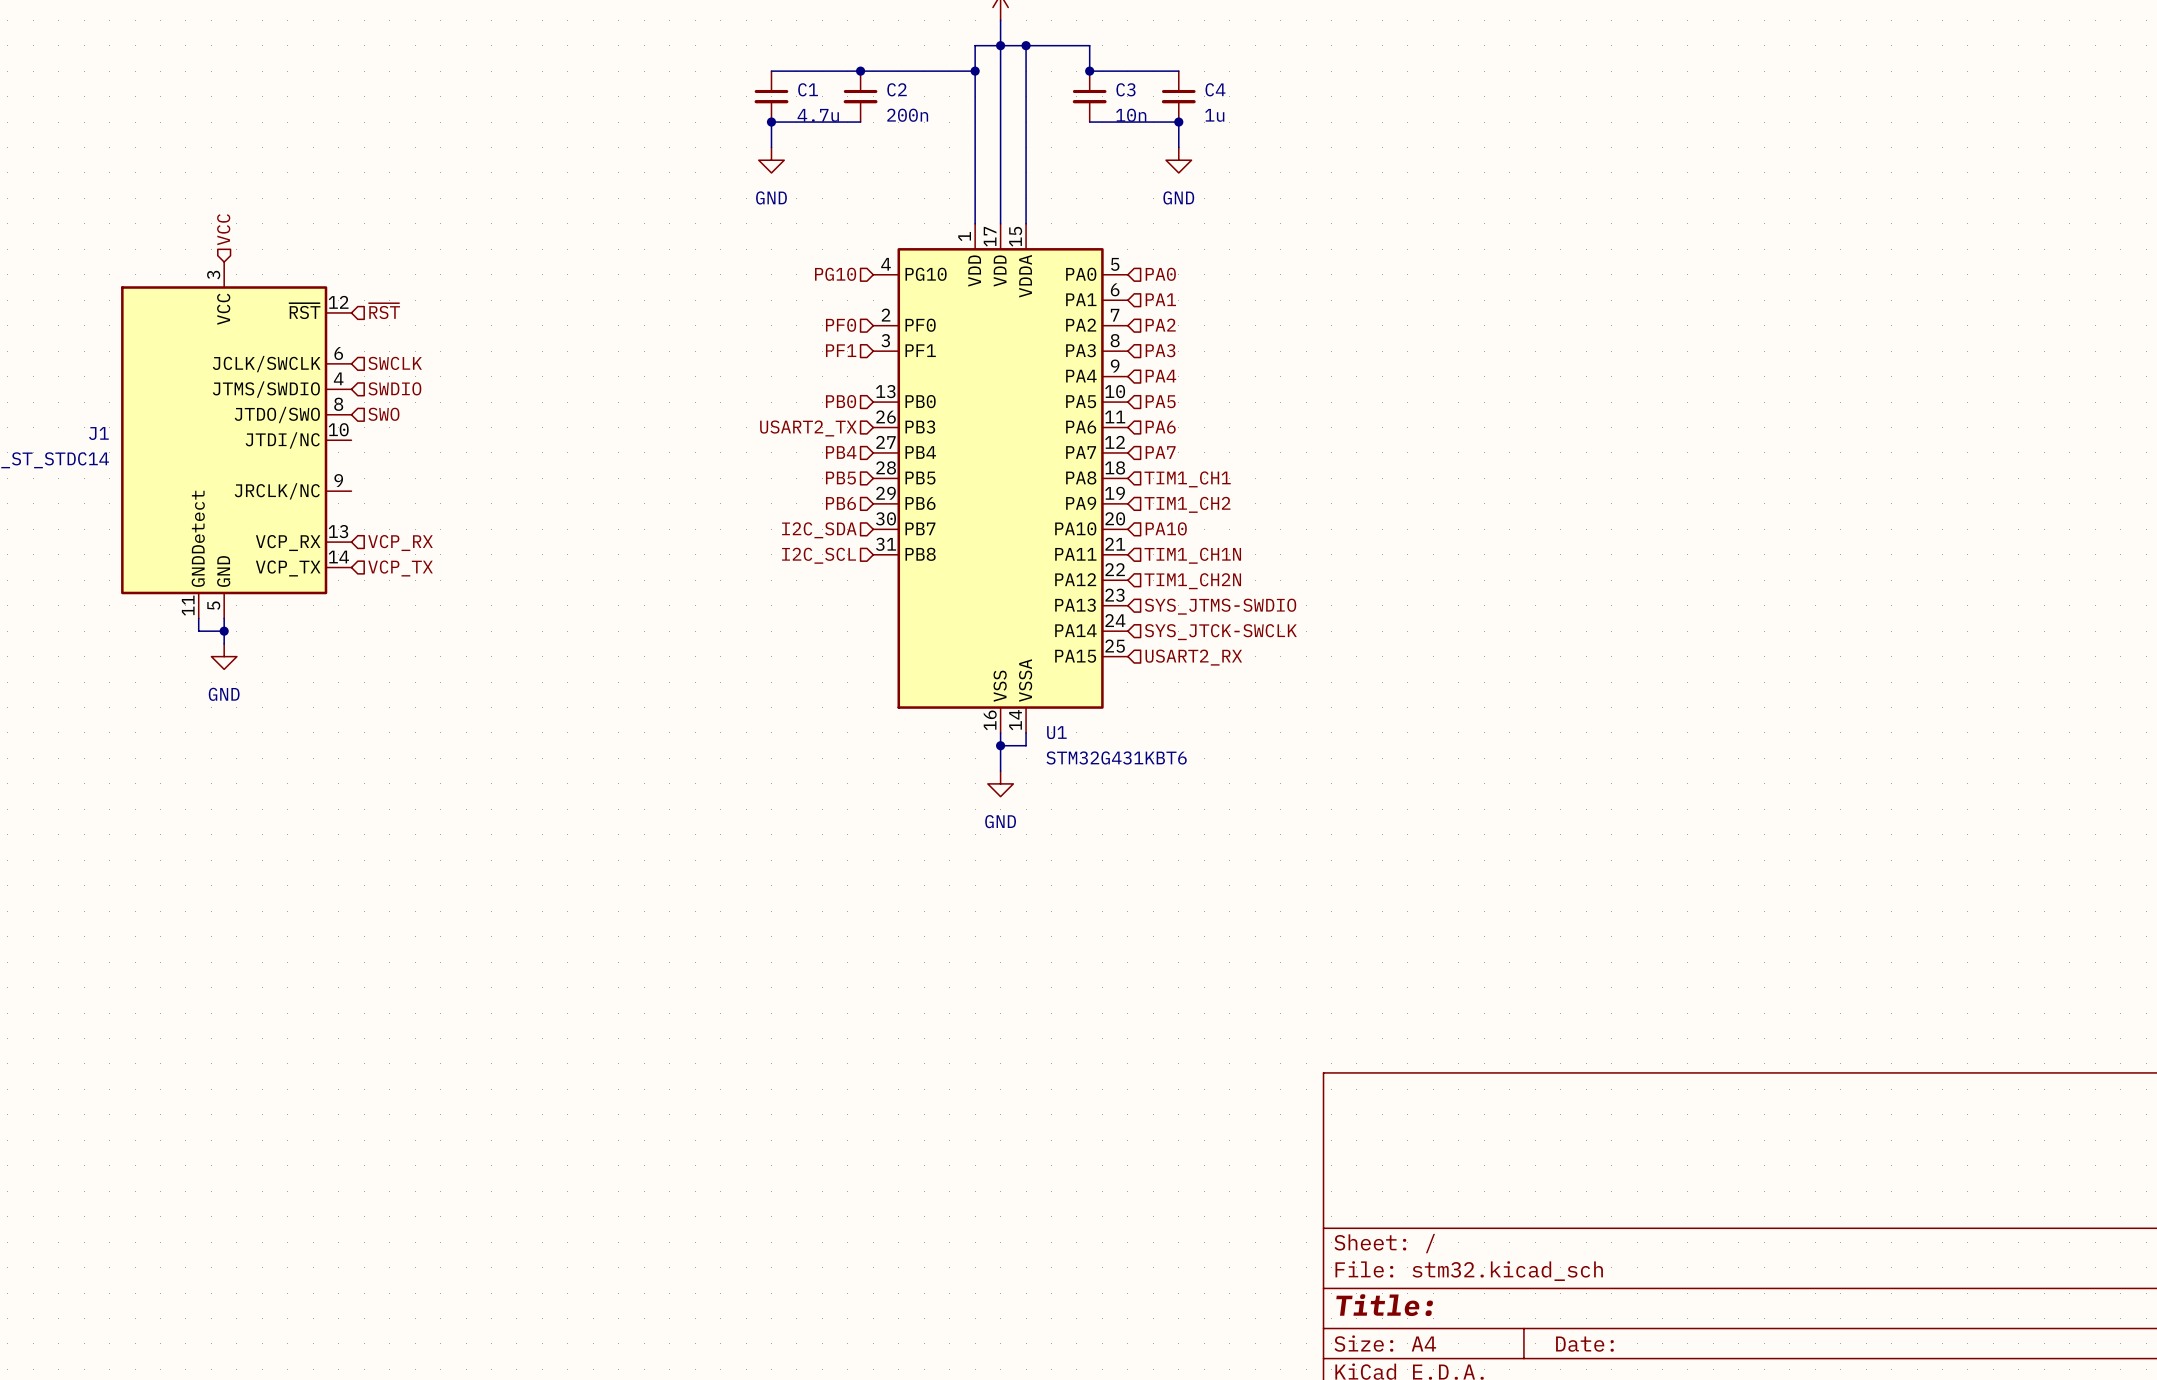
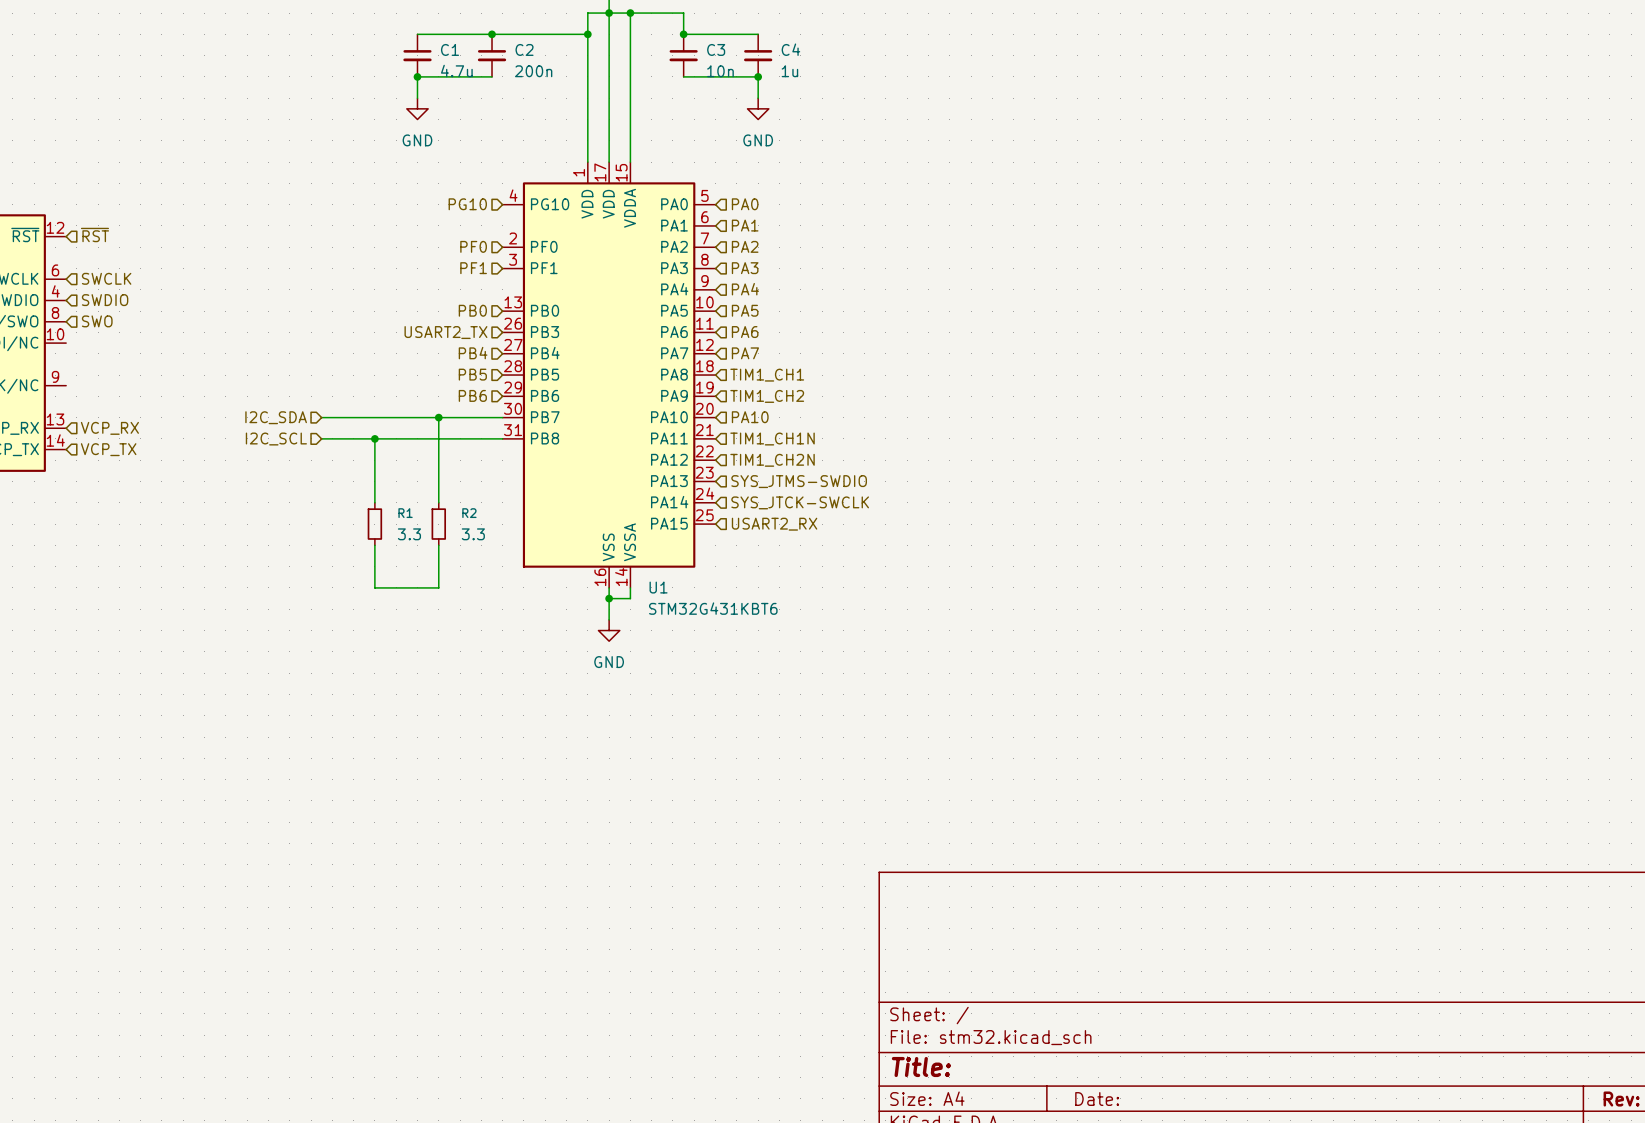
wire: none -> (321, 417) (502, 417)
wire: none -> (438, 417) (438, 502)
junction: none -> (438, 417)
hierarchical label position: I2C_SDA (819, 530) -> I2C_SDA (276, 417)
wire: none -> (321, 438) (502, 438)
wire: none -> (374, 438) (374, 502)
junction: none -> (374, 438)
hierarchical label position: I2C_SCL (819, 555) -> I2C_SCL (276, 439)
R1: none -> 3.3 (374, 524)
R2: none -> 3.3 (438, 524)
wire: none -> (374, 545) (374, 587) (438, 587) (438, 545)

